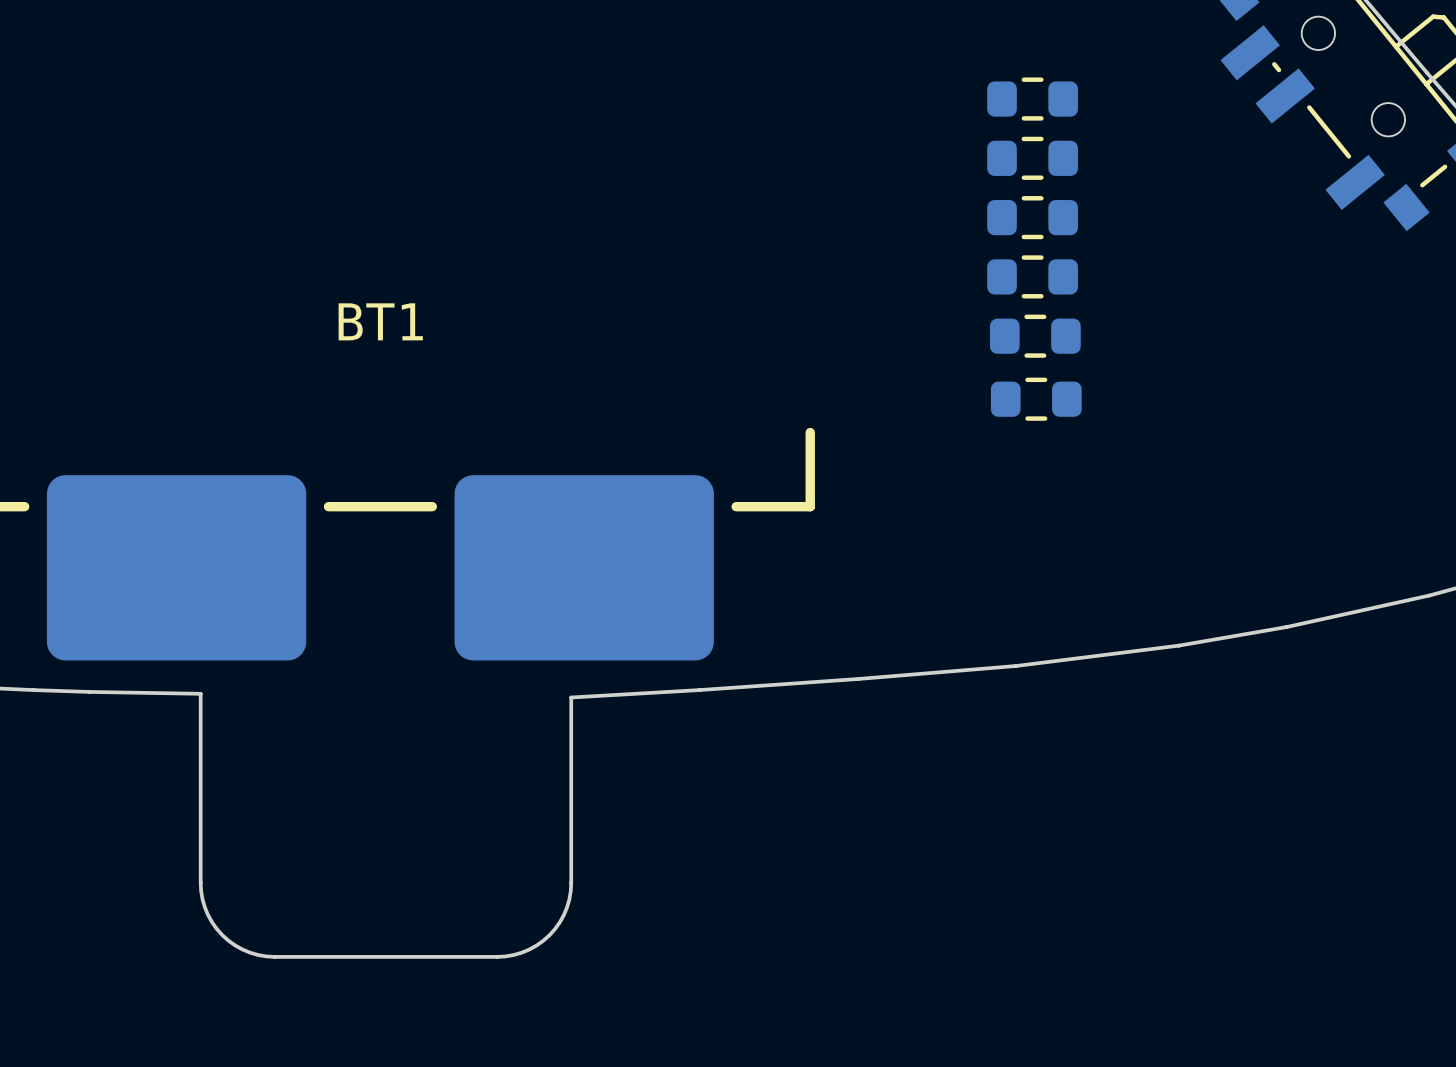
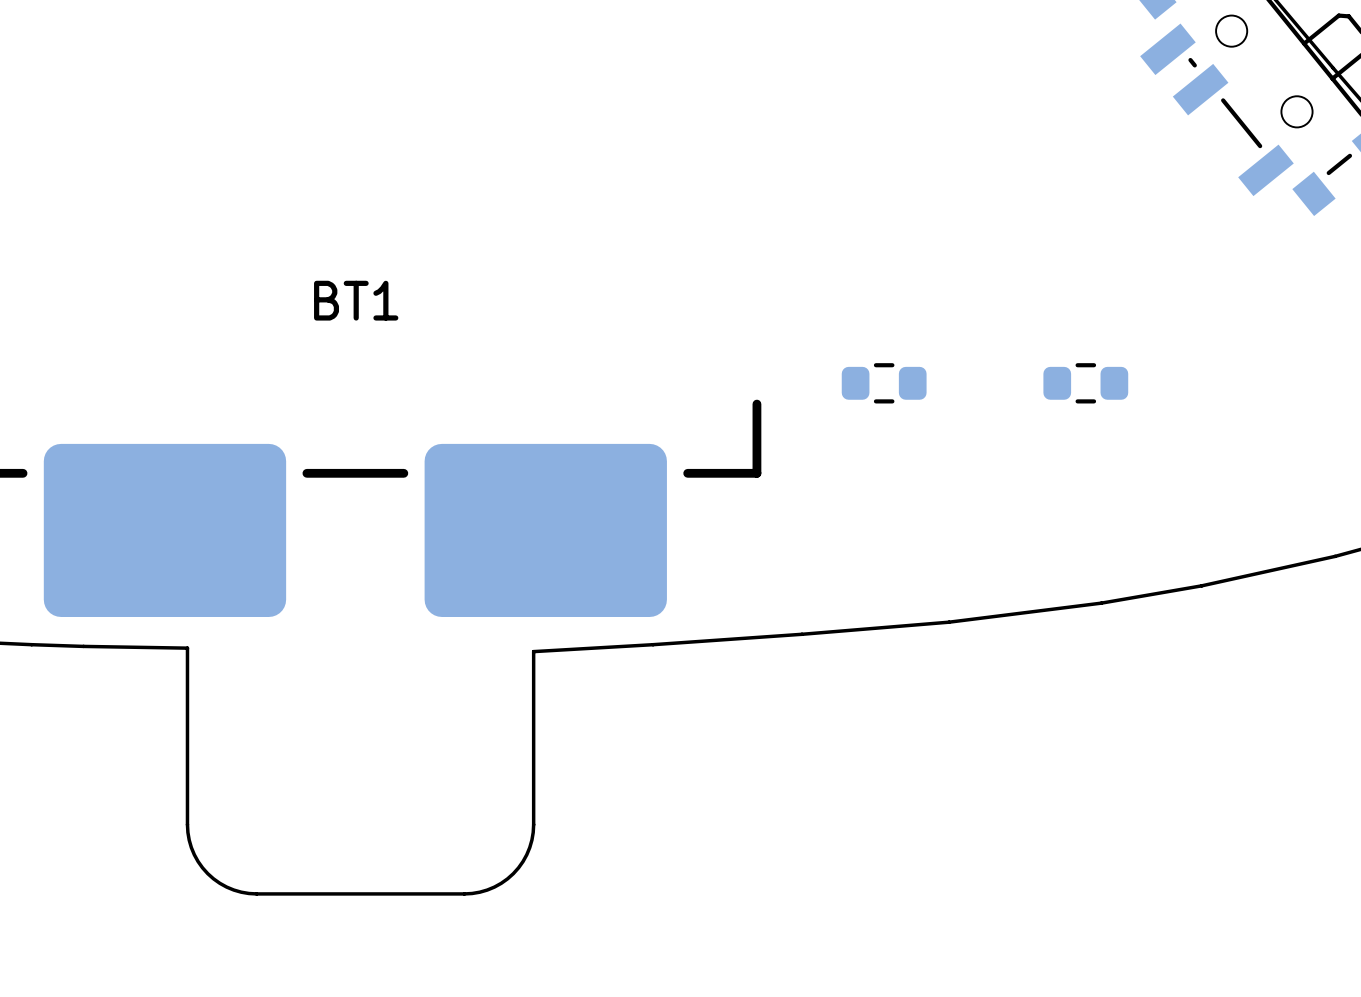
part: (1032, 99) -> none
part: (1032, 158) -> none
part: (1032, 217) -> none
part: (1032, 276) -> none
part: (1035, 336) -> none
part: (1036, 399) -> none
part: none -> (884, 383)
part: none -> (1085, 383)

